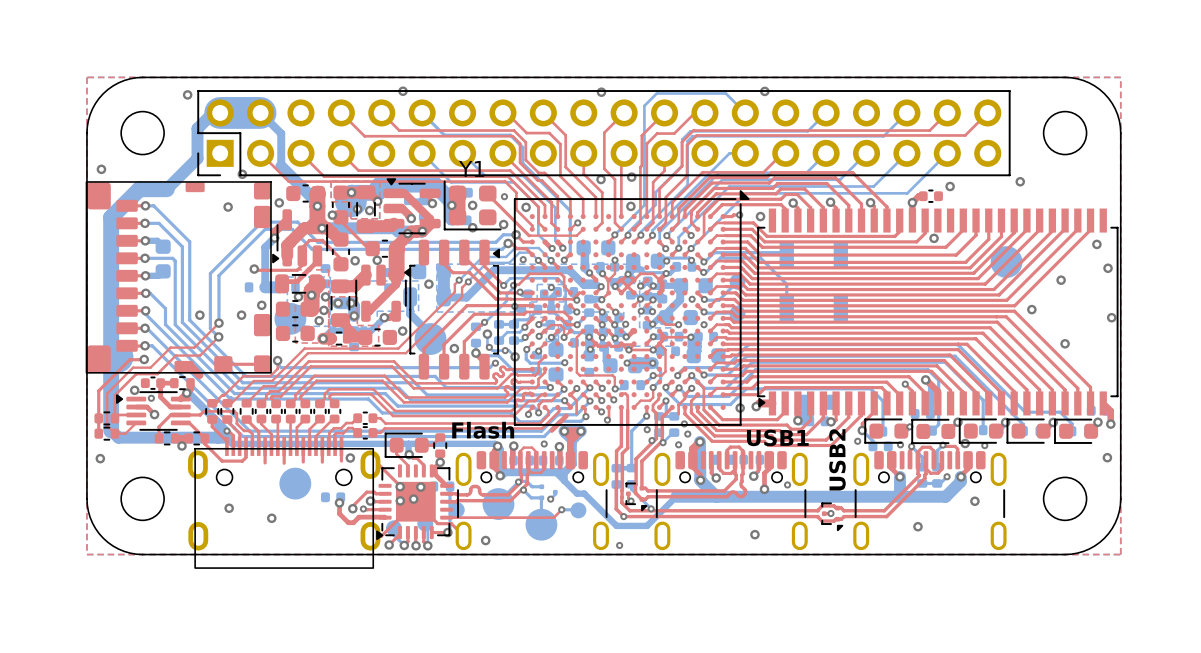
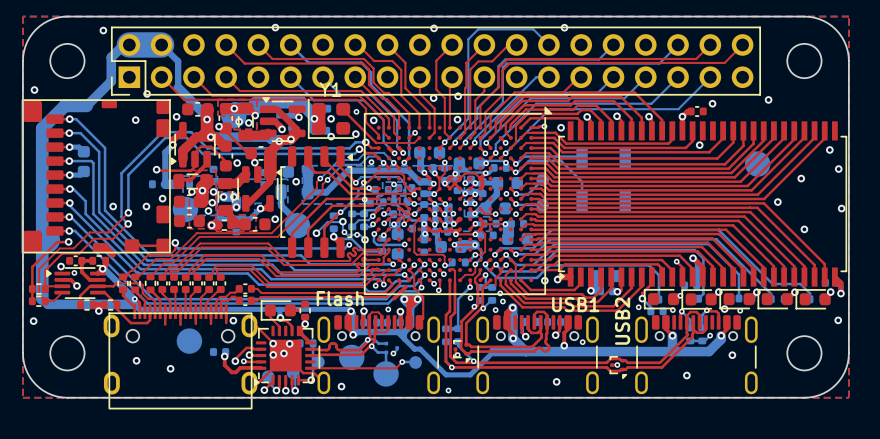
bottom track: none -> (342, 221) (327, 222) (316, 233)
top track: none -> (414, 285) (414, 288) (423, 297) (423, 318) (419, 322)

